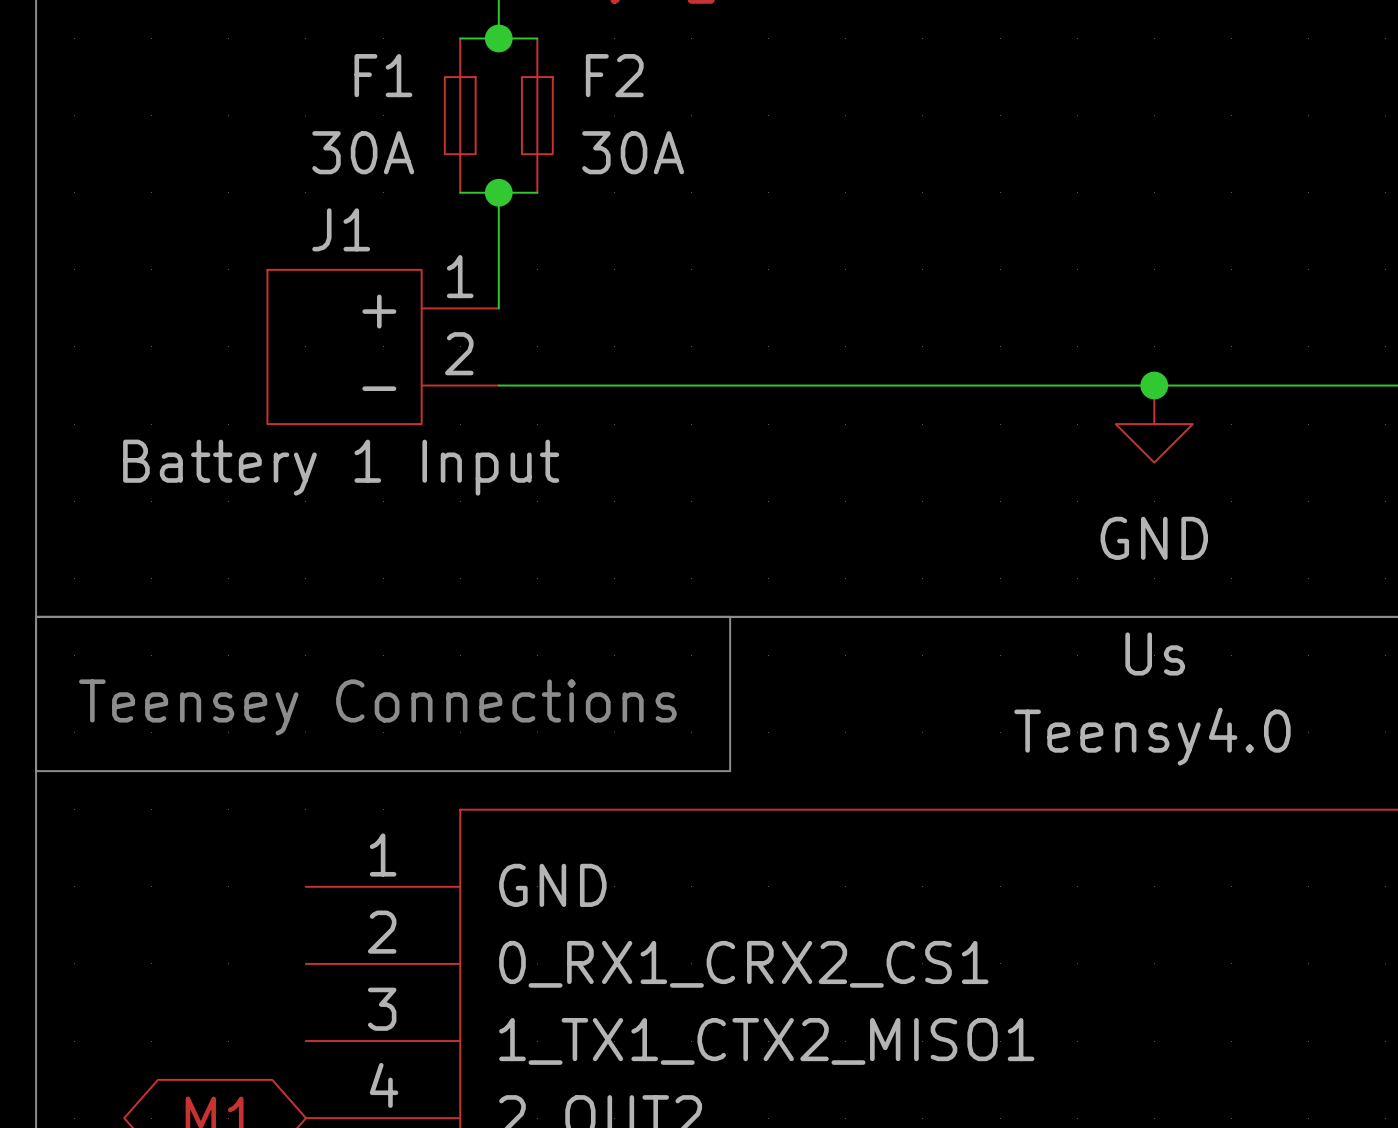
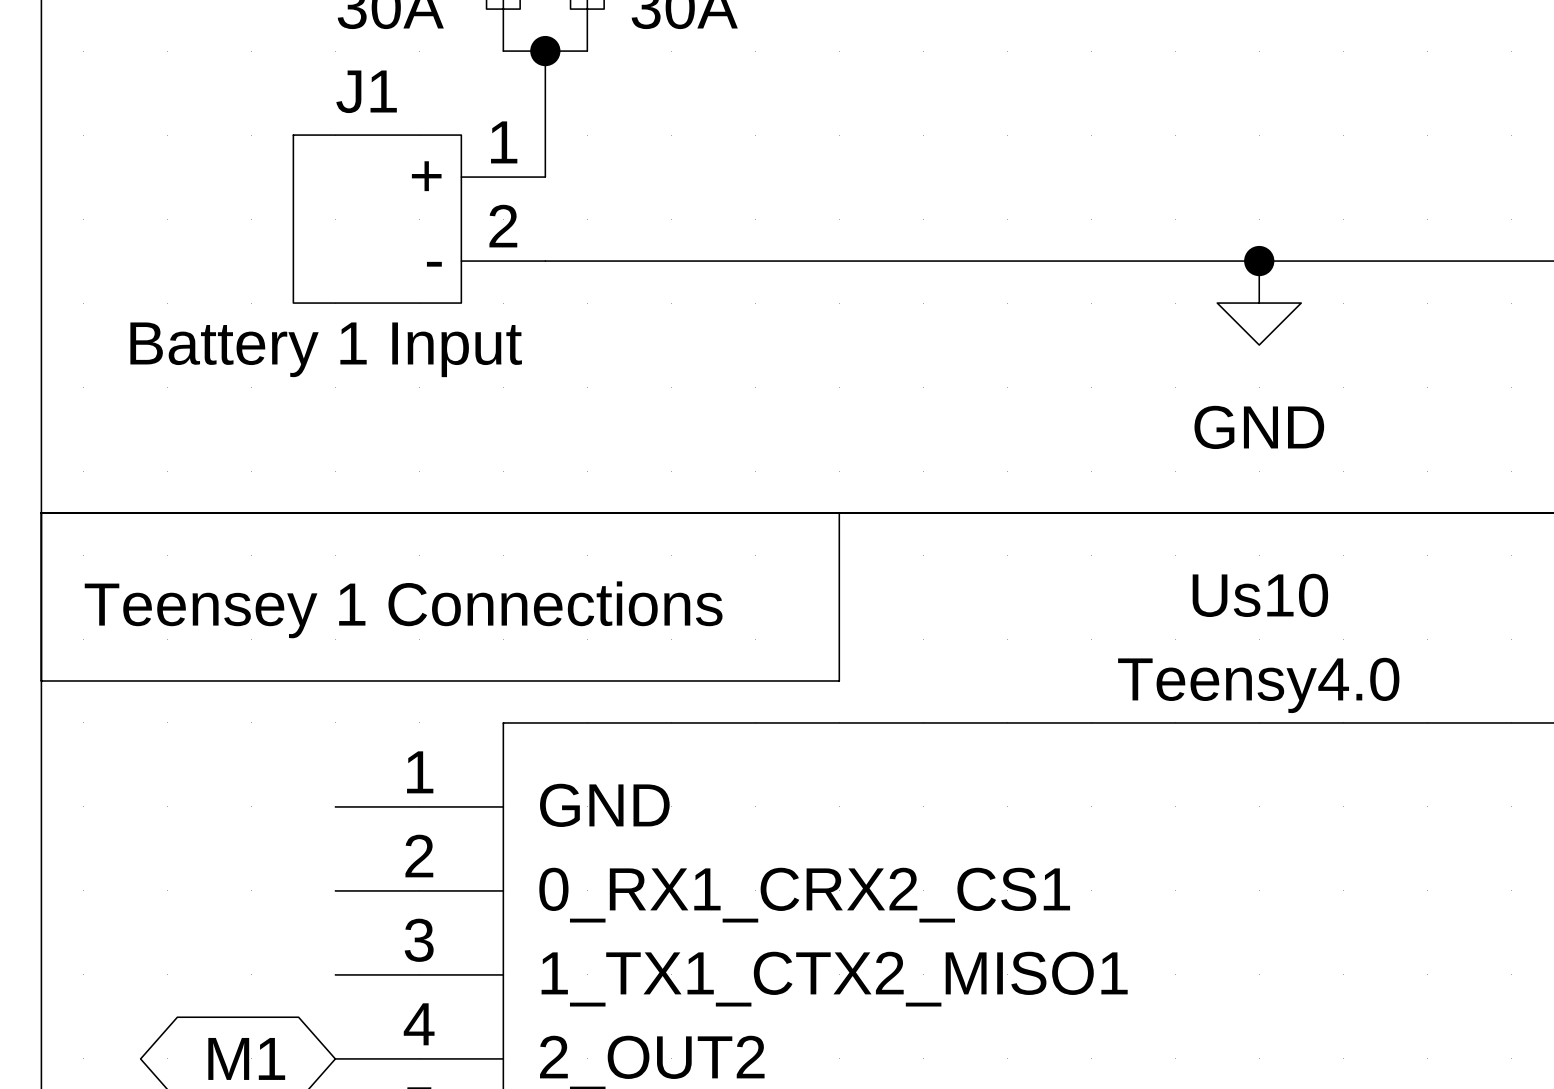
line: (730, 616) (730, 771) -> (839, 513) (839, 680) (797, 680)
Us name: Us (1155, 654) -> Us10 (1260, 595)
text: Teensey Connections (377, 707) -> Teensey 1 Connections (403, 609)
Us value position: Teensy4.0 (1152, 736) -> Teensy4.0 (1258, 685)

